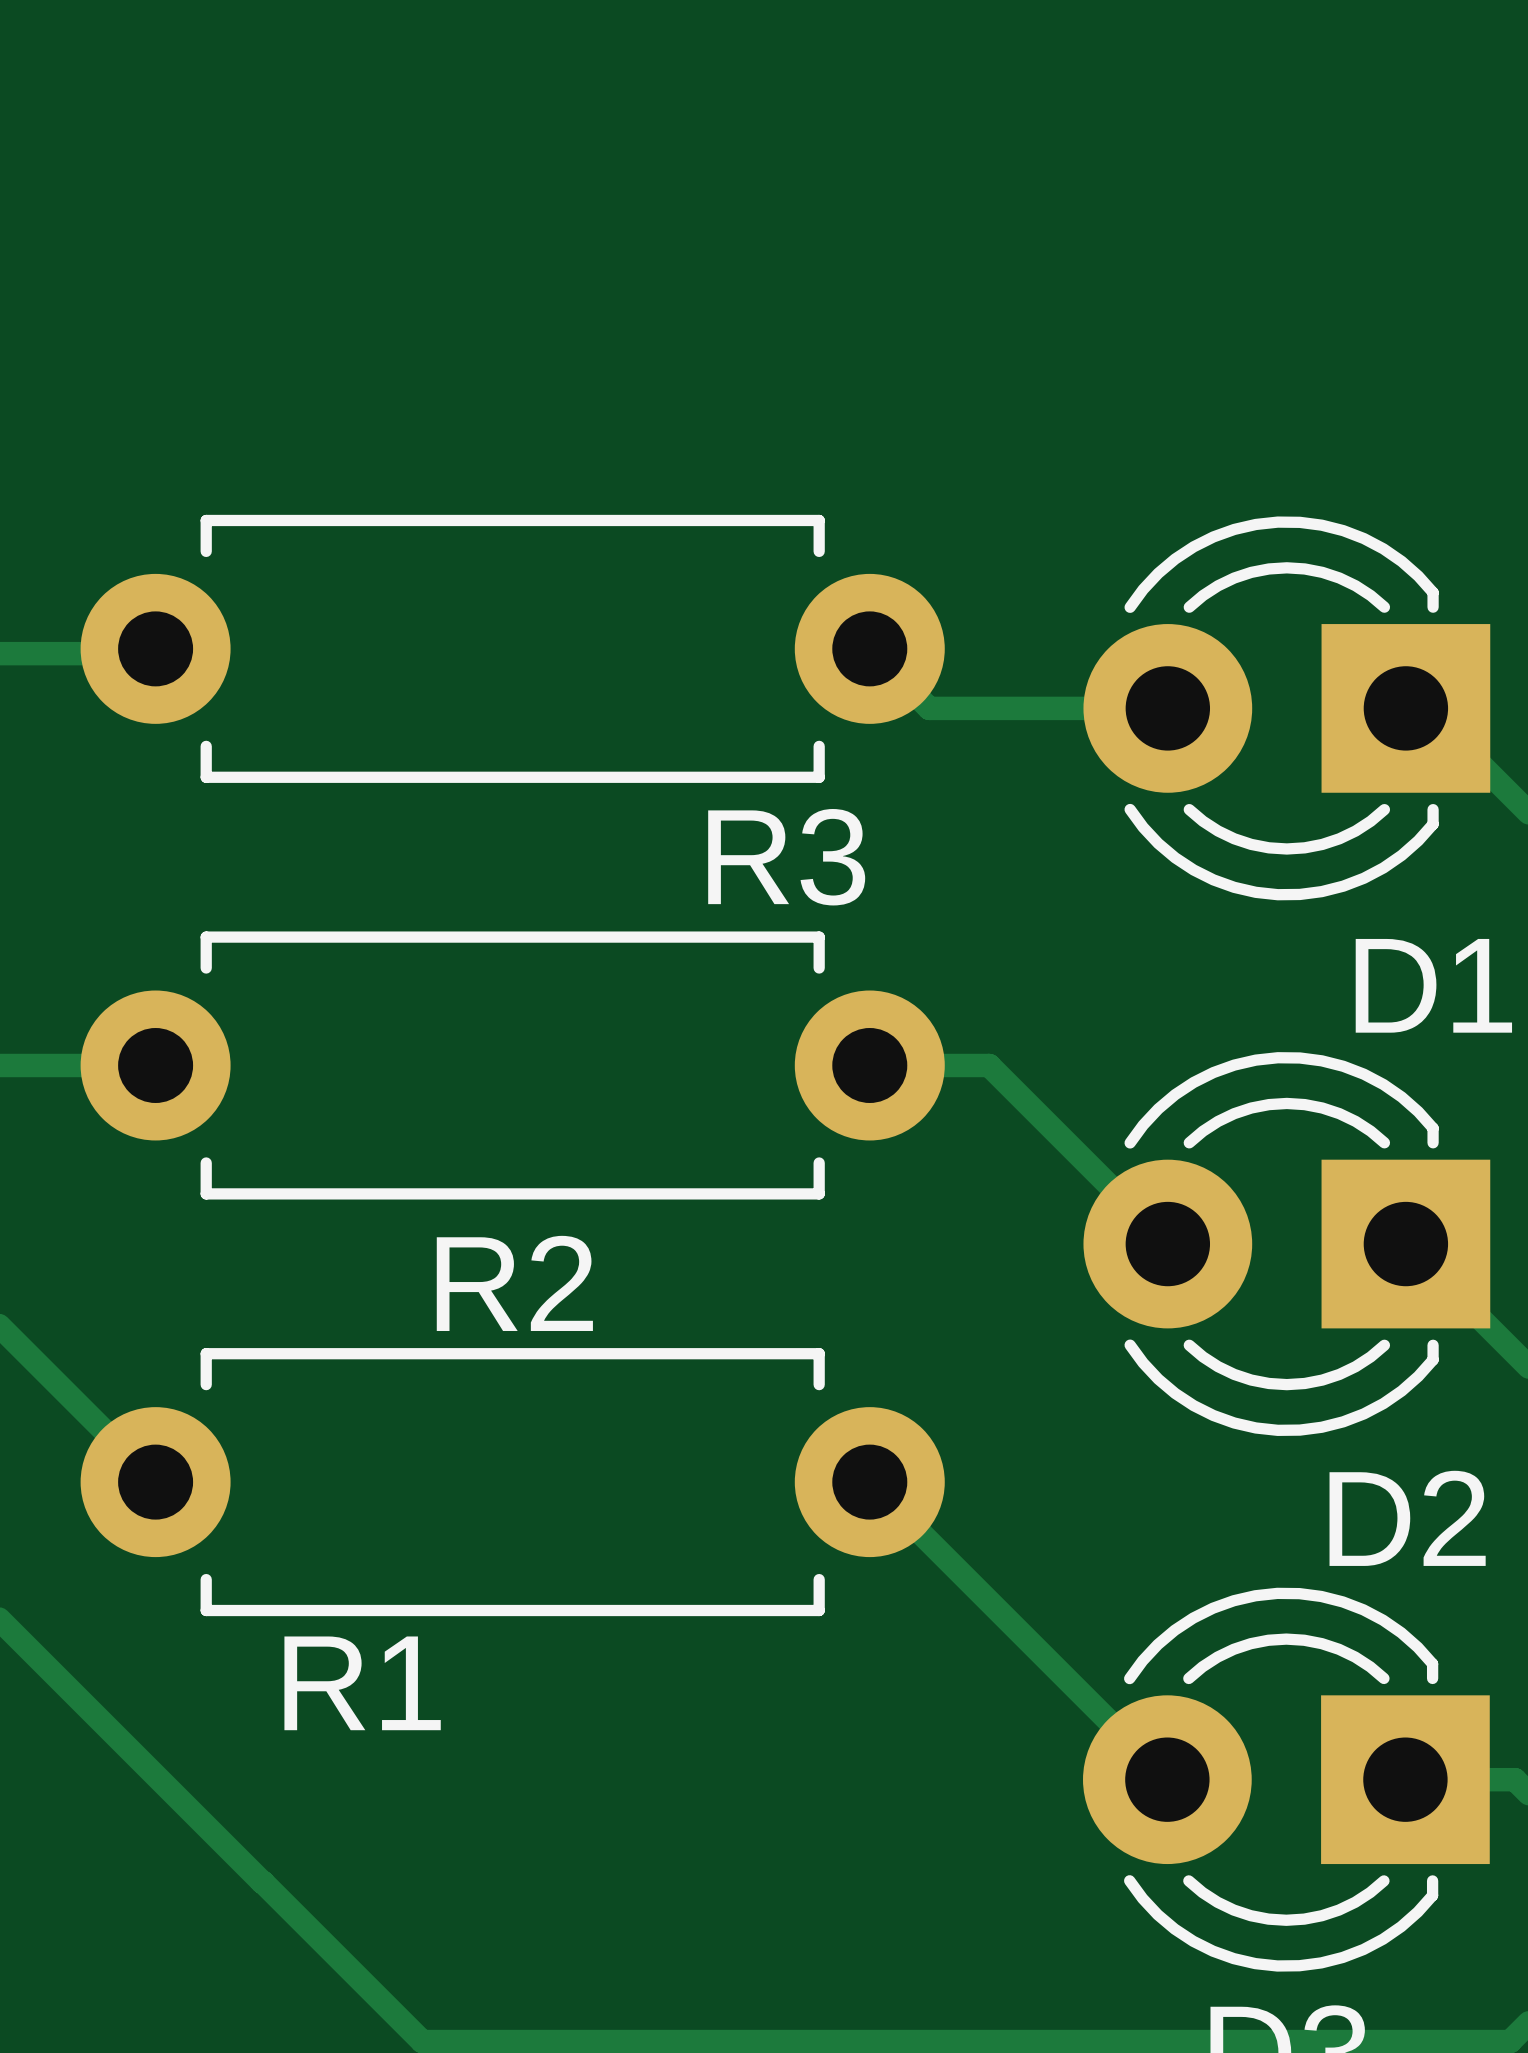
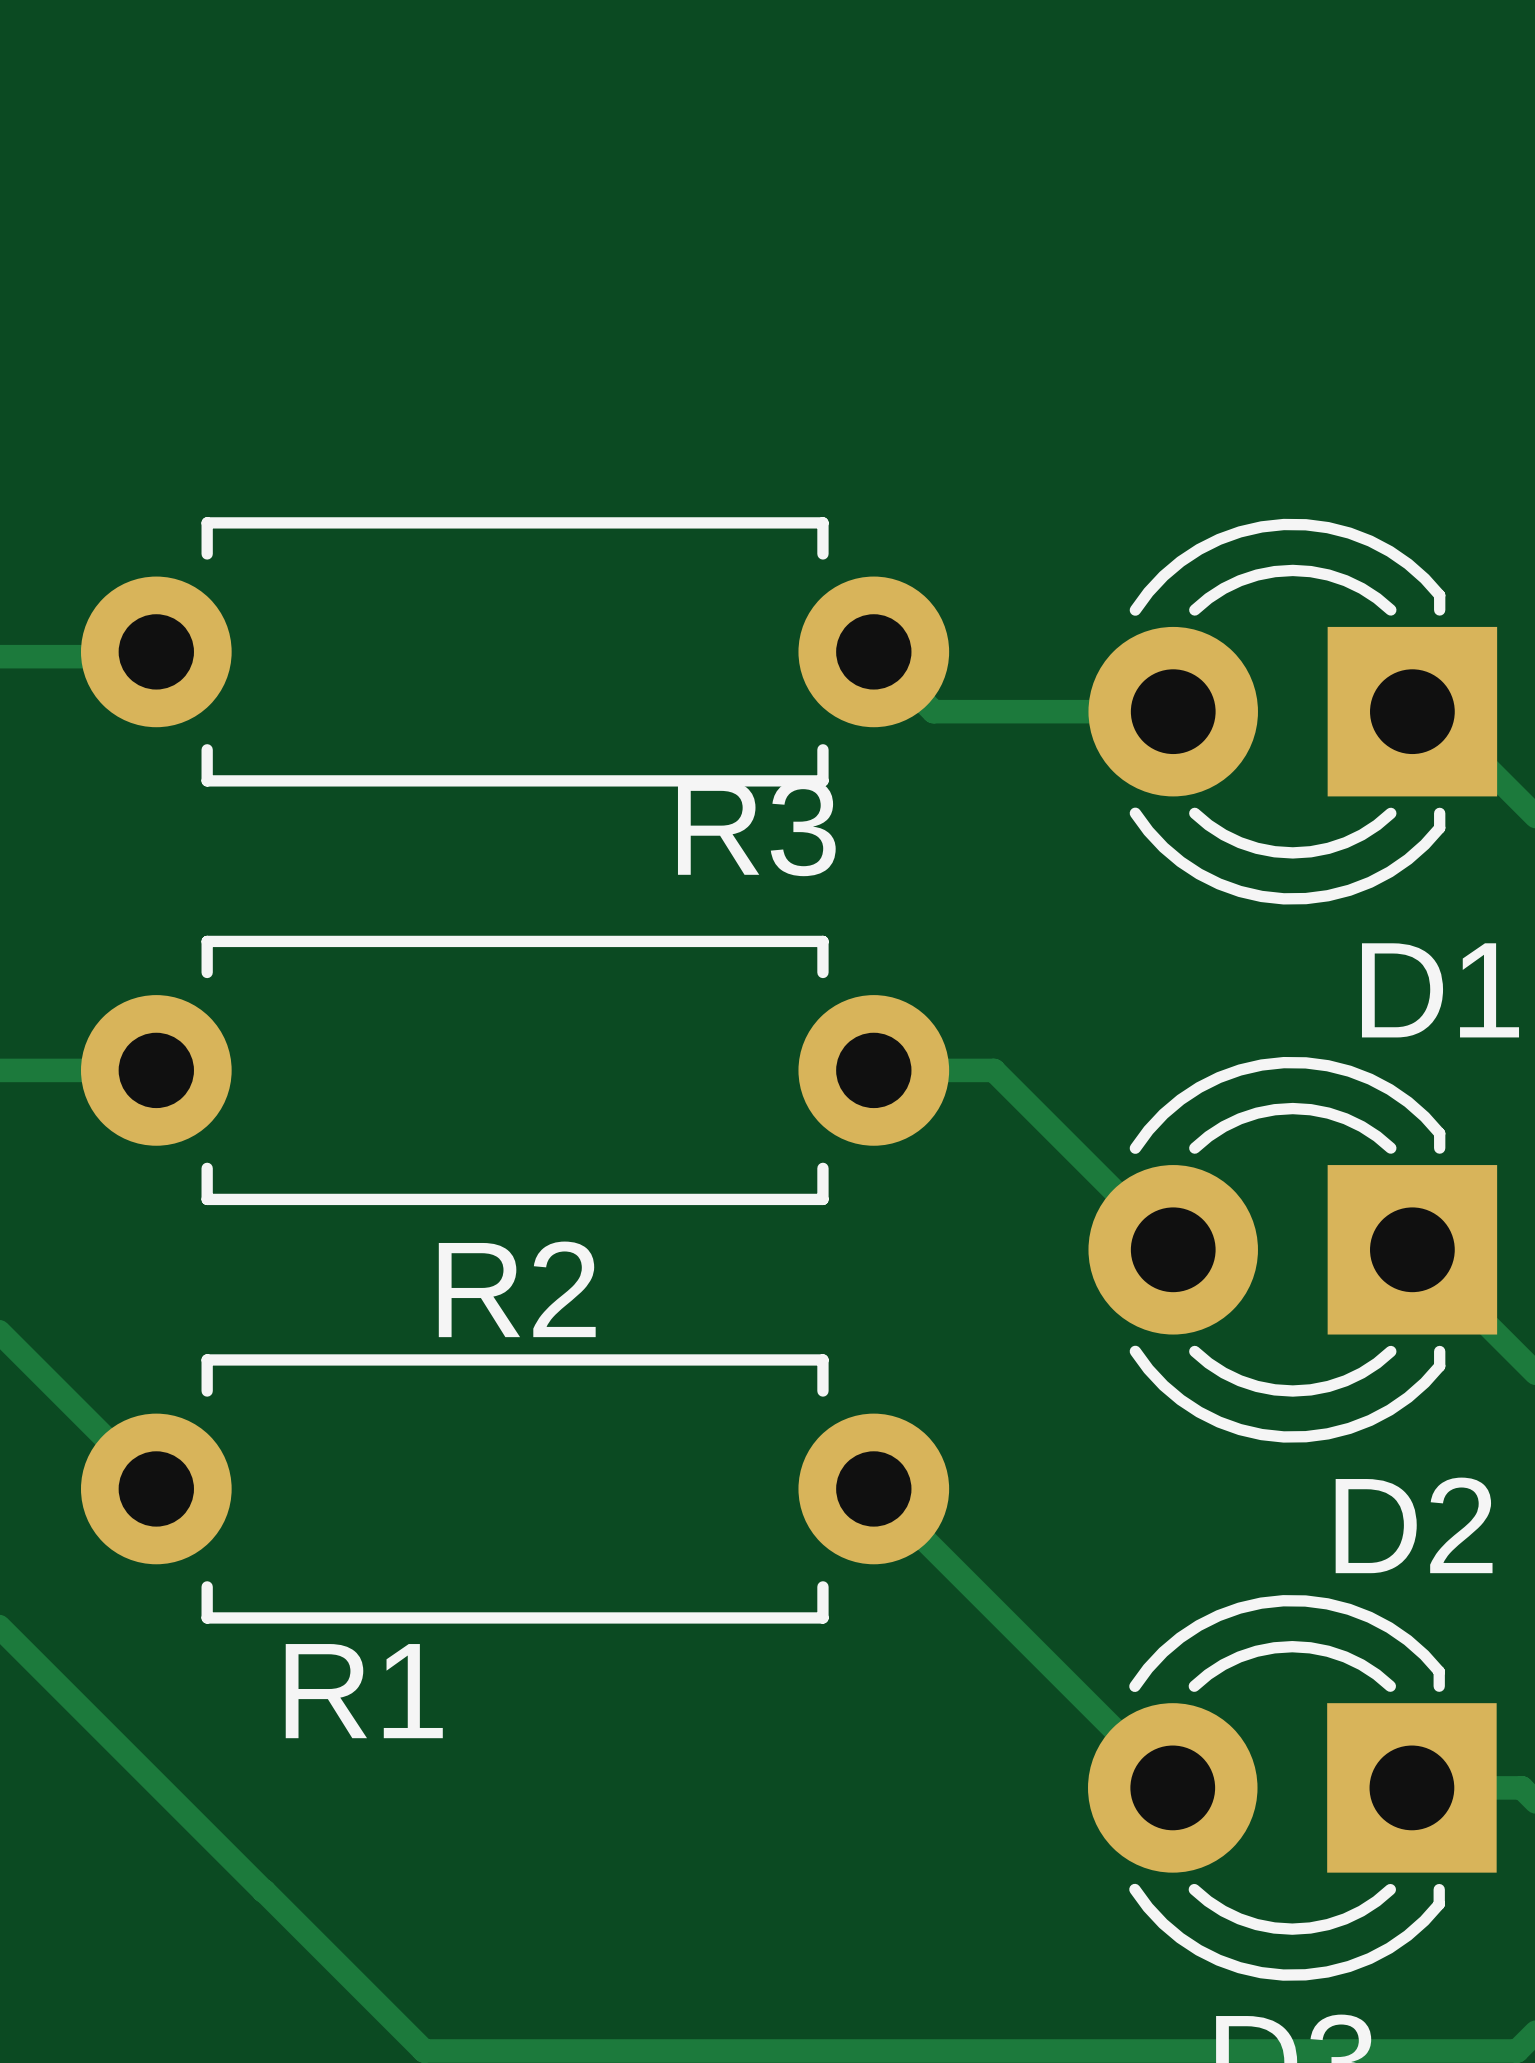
R3 name position: R3 (786, 857) -> R3 (756, 827)

